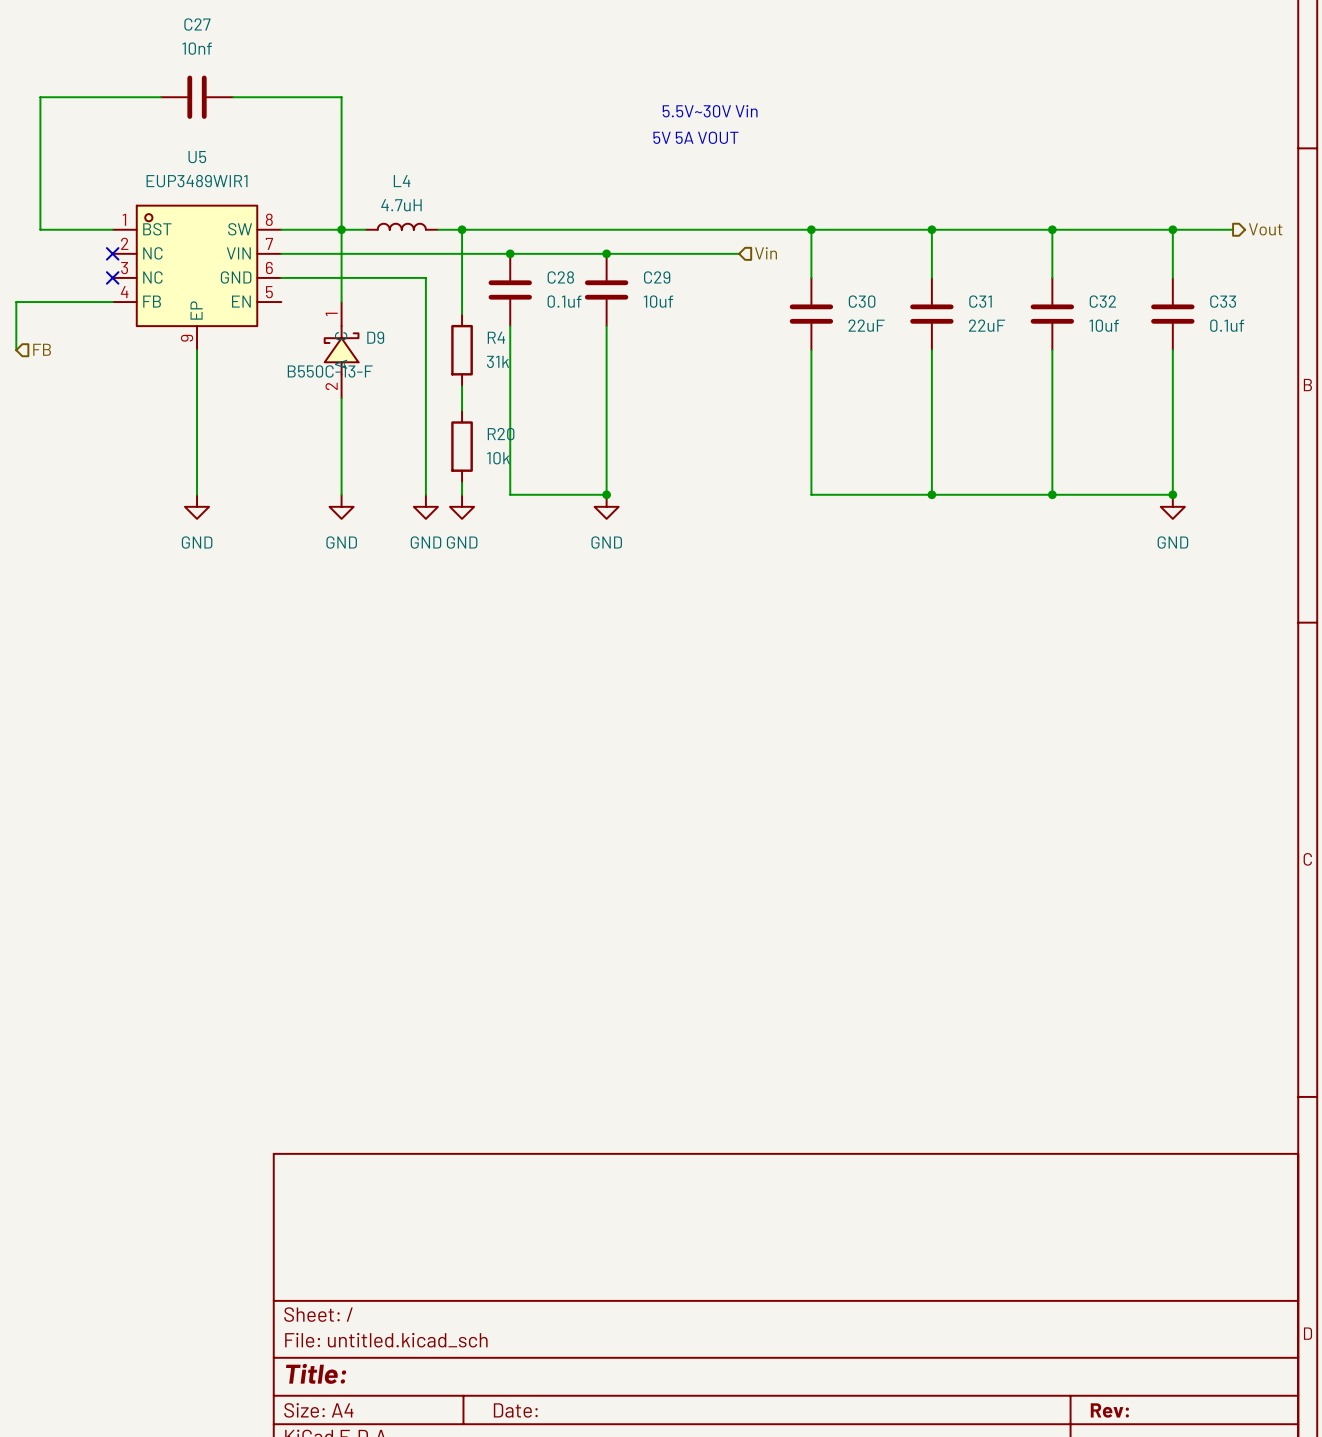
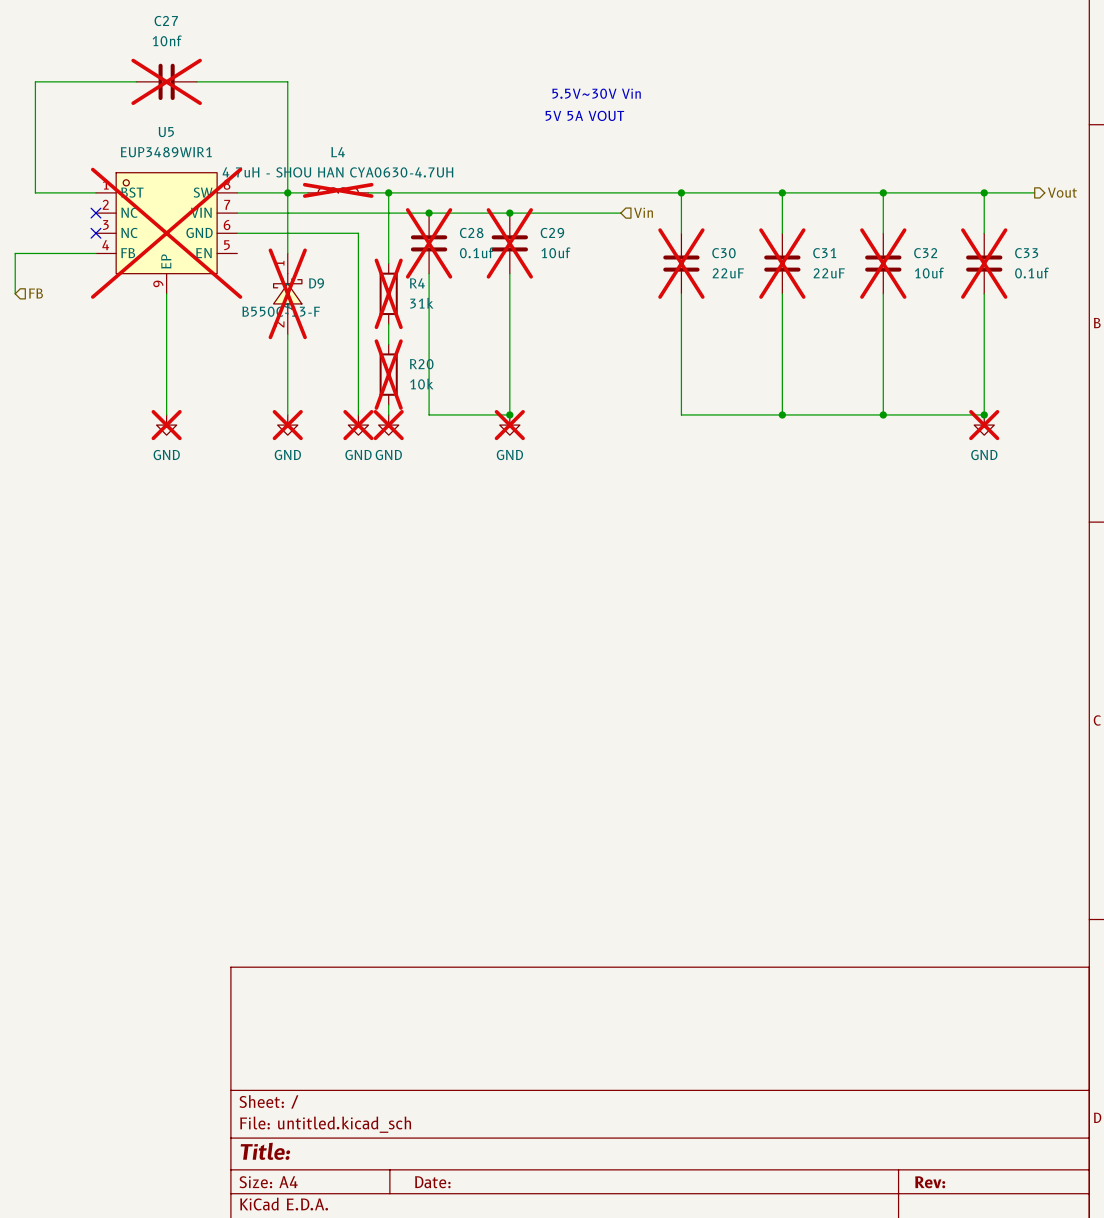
C27 do-not-place cross: none -> (166, 81)
L4 value: 4.7uH (401, 205) -> 4.7uH - SHOU HAN CYA0630-4.7UH (337, 172)
L4 do-not-place cross: none -> (338, 190)
U5 do-not-place cross: none -> (166, 233)
C28 do-not-place cross: none -> (429, 243)
C29 do-not-place cross: none -> (509, 243)
C30 do-not-place cross: none -> (681, 263)
C31 do-not-place cross: none -> (782, 263)
C32 do-not-place cross: none -> (883, 263)
C33 do-not-place cross: none -> (984, 263)
D9 do-not-place cross: none -> (287, 293)
R4 do-not-place cross: none -> (388, 293)
R20 do-not-place cross: none -> (388, 374)
power symbol do-not-place cross: none -> (166, 425)
power symbol do-not-place cross: none -> (287, 425)
power symbol do-not-place cross: none -> (358, 425)
power symbol do-not-place cross: none -> (388, 425)
power symbol do-not-place cross: none -> (509, 425)
power symbol do-not-place cross: none -> (984, 425)

